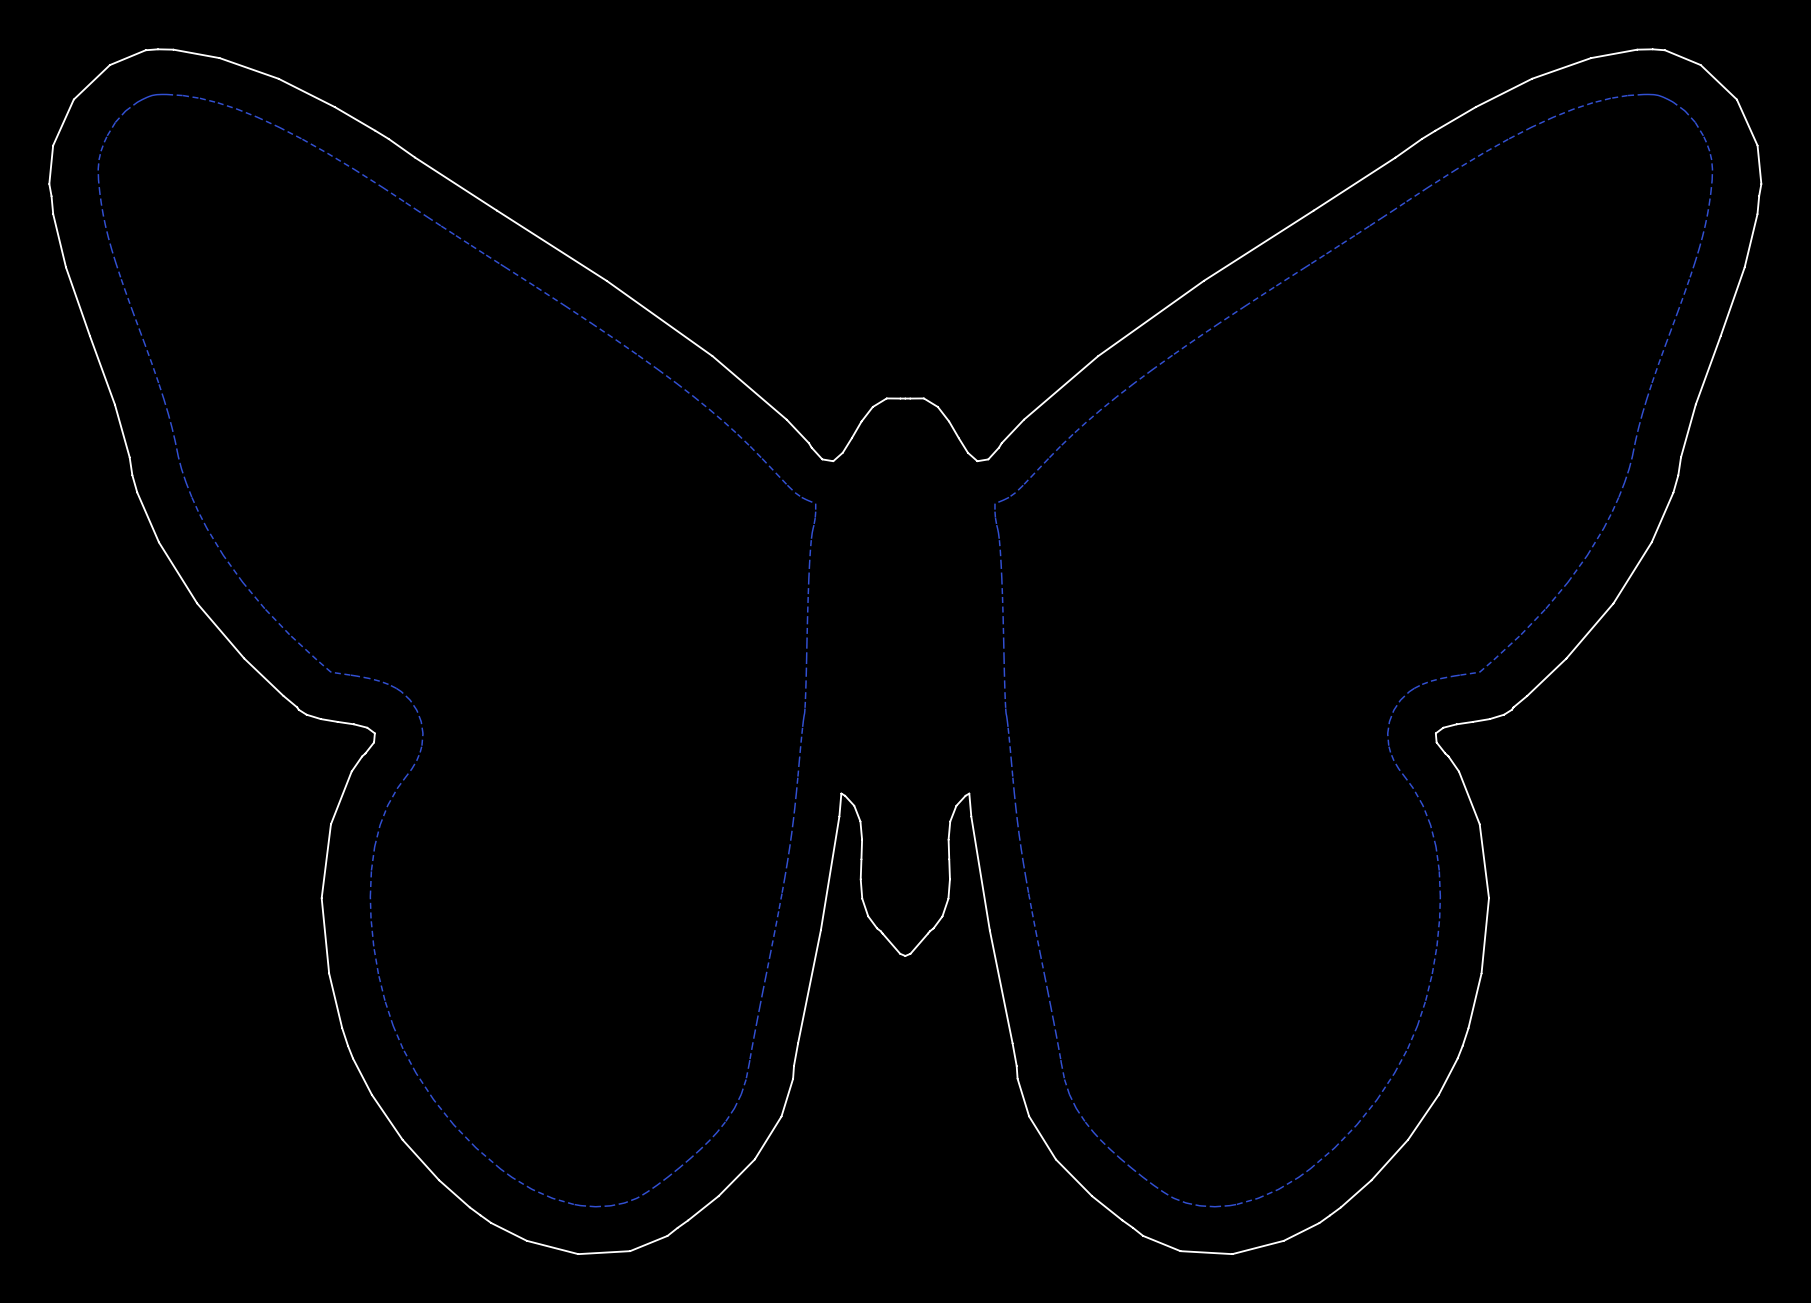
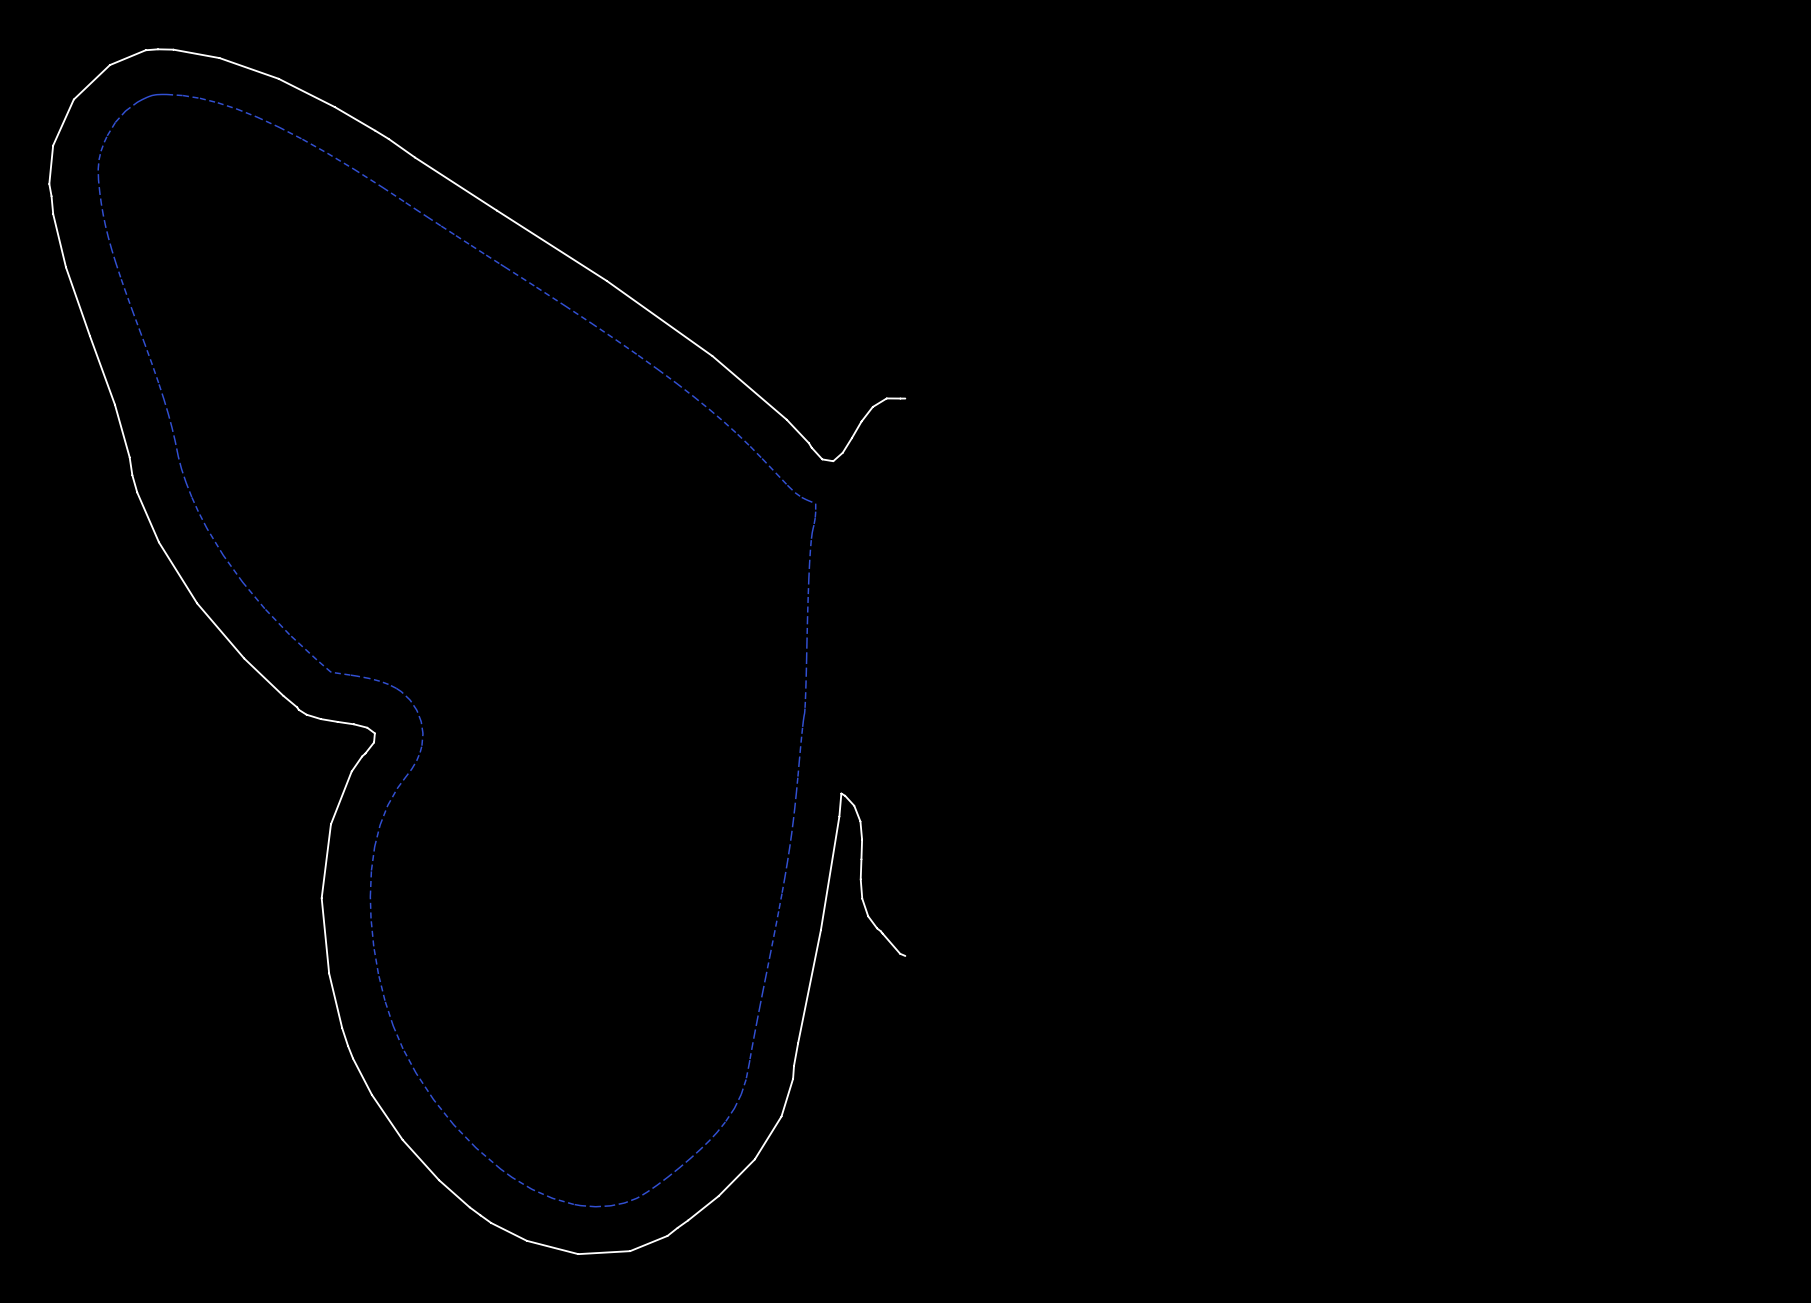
bottom zone outline: (1643, 94) (1610, 98) (1592, 102) (1553, 117) (1508, 139) (1456, 169) (1245, 306) (1152, 369) (1086, 422) (1015, 492) (994, 503) (1001, 562) (1005, 708) (1017, 821) (1028, 893) (1064, 1079) (1076, 1108) (1093, 1132) (1131, 1167) (1173, 1198) (1200, 1205) (1230, 1205) (1258, 1198) (1298, 1177) (1334, 1148) (1377, 1099) (1394, 1073) (1417, 1025) (1425, 1000) (1436, 946) (1440, 896) (1439, 870) (1430, 825) (1422, 805) (1398, 769) (1390, 752) (1387, 733) (1389, 721) (1400, 700) (1414, 688) (1441, 678) (1479, 672) (1521, 634) (1545, 608) (1587, 555) (1603, 528) (1618, 496) (1629, 468) (1646, 399) (1699, 249) (1707, 215) (1712, 180) (1709, 151) (1695, 122) (1685, 110) (1668, 99) (1658, 95) (1643, 94) -> none
board edge: (905, 398) (923, 398) (937, 406) (967, 452) (977, 461) (988, 459) (1023, 419) (1098, 356) (1204, 280) (1422, 138) (1475, 107) (1532, 78) (1591, 58) (1637, 49) (1652, 49) (1664, 50) (1700, 65) (1736, 99) (1757, 145) (1761, 184) (1757, 214) (1744, 267) (1695, 404) (1673, 492) (1651, 542) (1613, 603) (1566, 658) (1511, 709) (1504, 714) (1489, 719) (1443, 727) (1435, 733) (1436, 742) (1459, 771) (1479, 824) (1489, 898) (1481, 973) (1462, 1045) (1438, 1094) (1408, 1139) (1371, 1180) (1340, 1207) (1319, 1223) (1283, 1240) (1232, 1254) (1180, 1251) (1143, 1235) (1092, 1196) (1055, 1159) (1029, 1116) (1017, 1078) (1012, 1043) (989, 930) (969, 793) (956, 805) (950, 821) (948, 898) (942, 916) (910, 953) (905, 955) -> none

